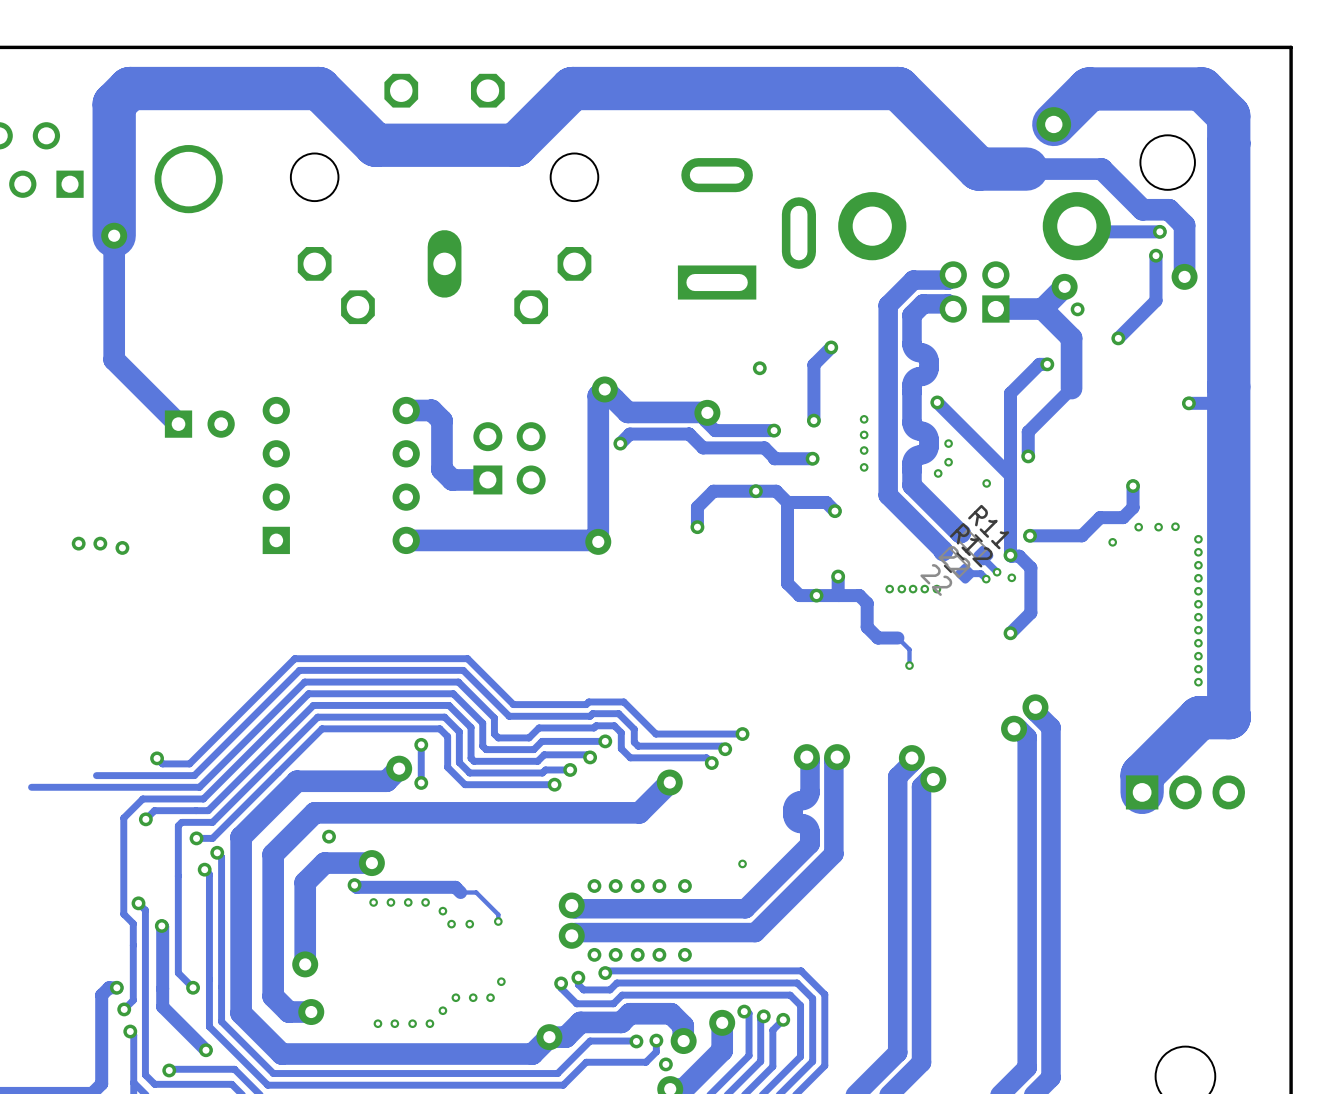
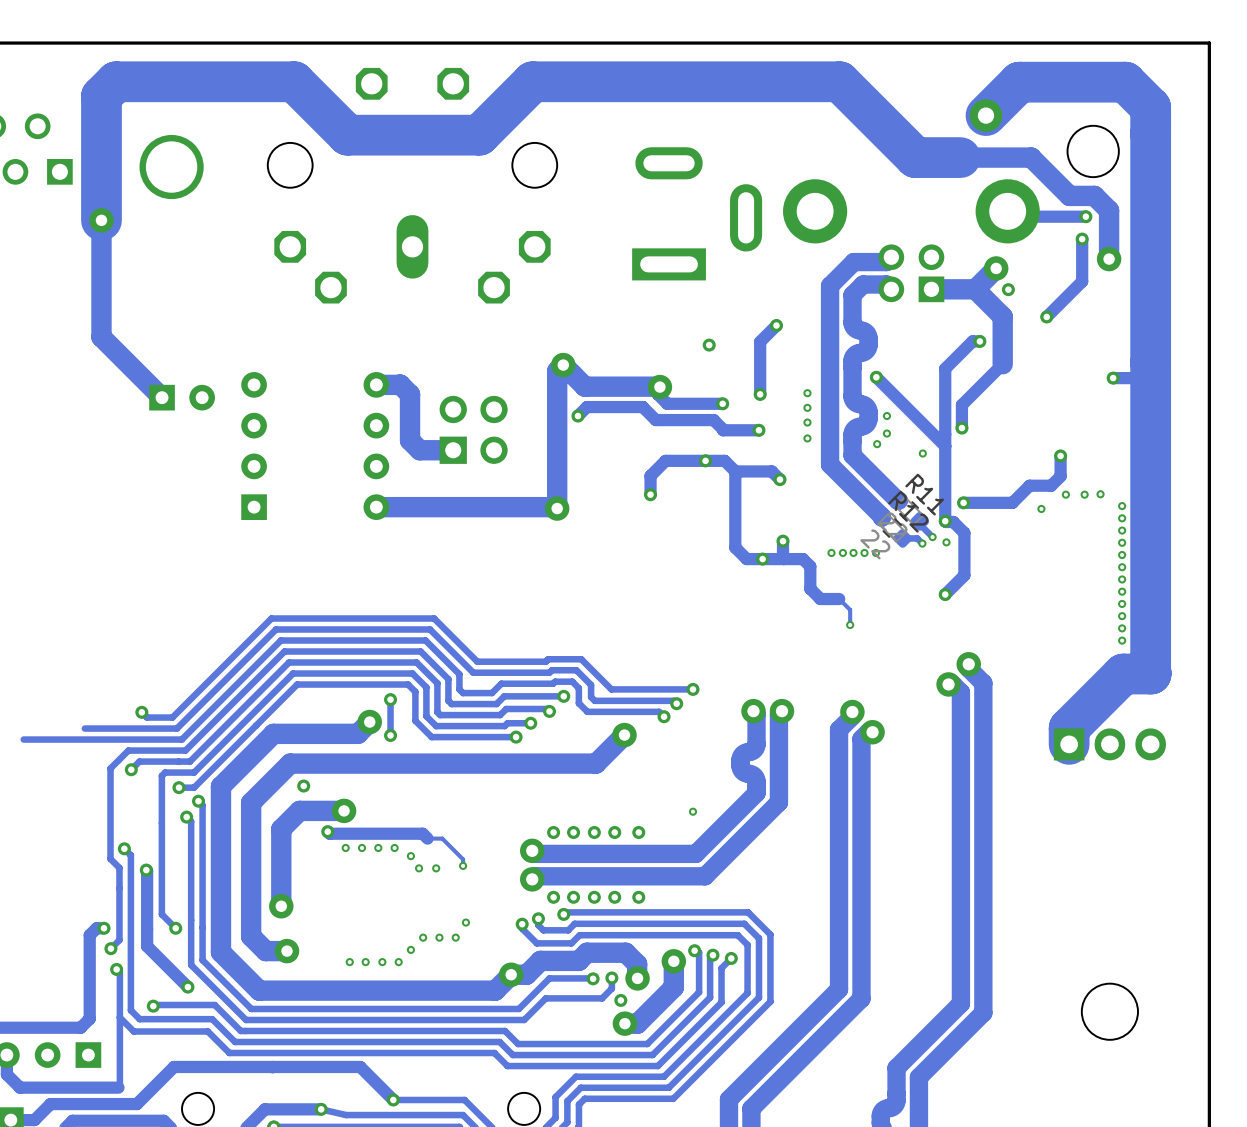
via: (78, 543) -> none
via: (100, 543) -> none
via: (122, 547) -> none

